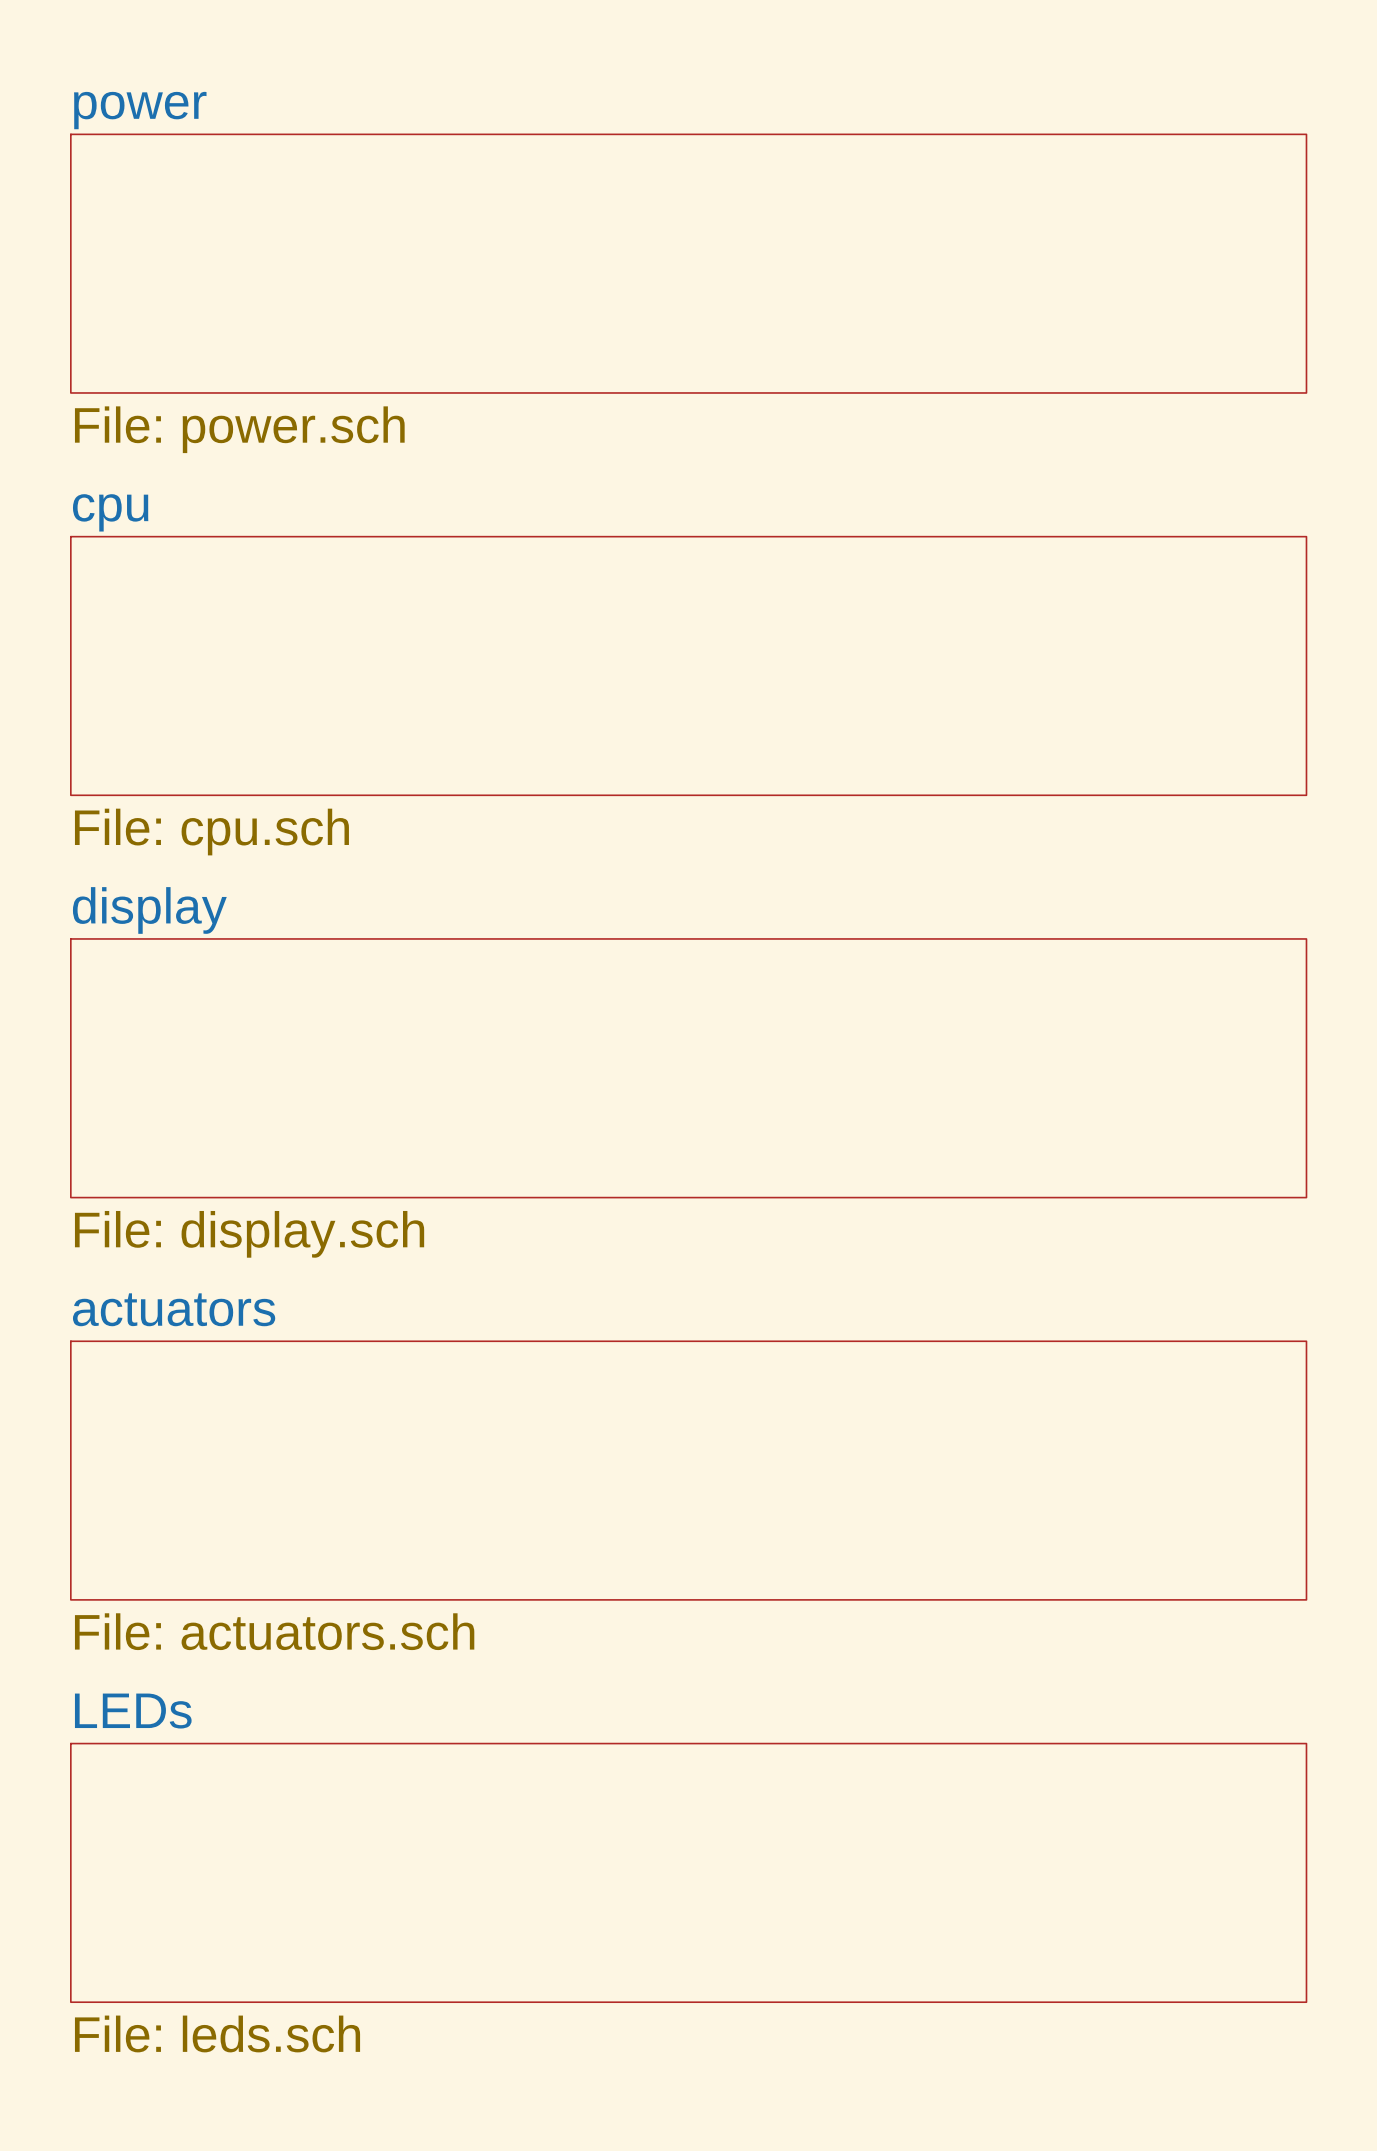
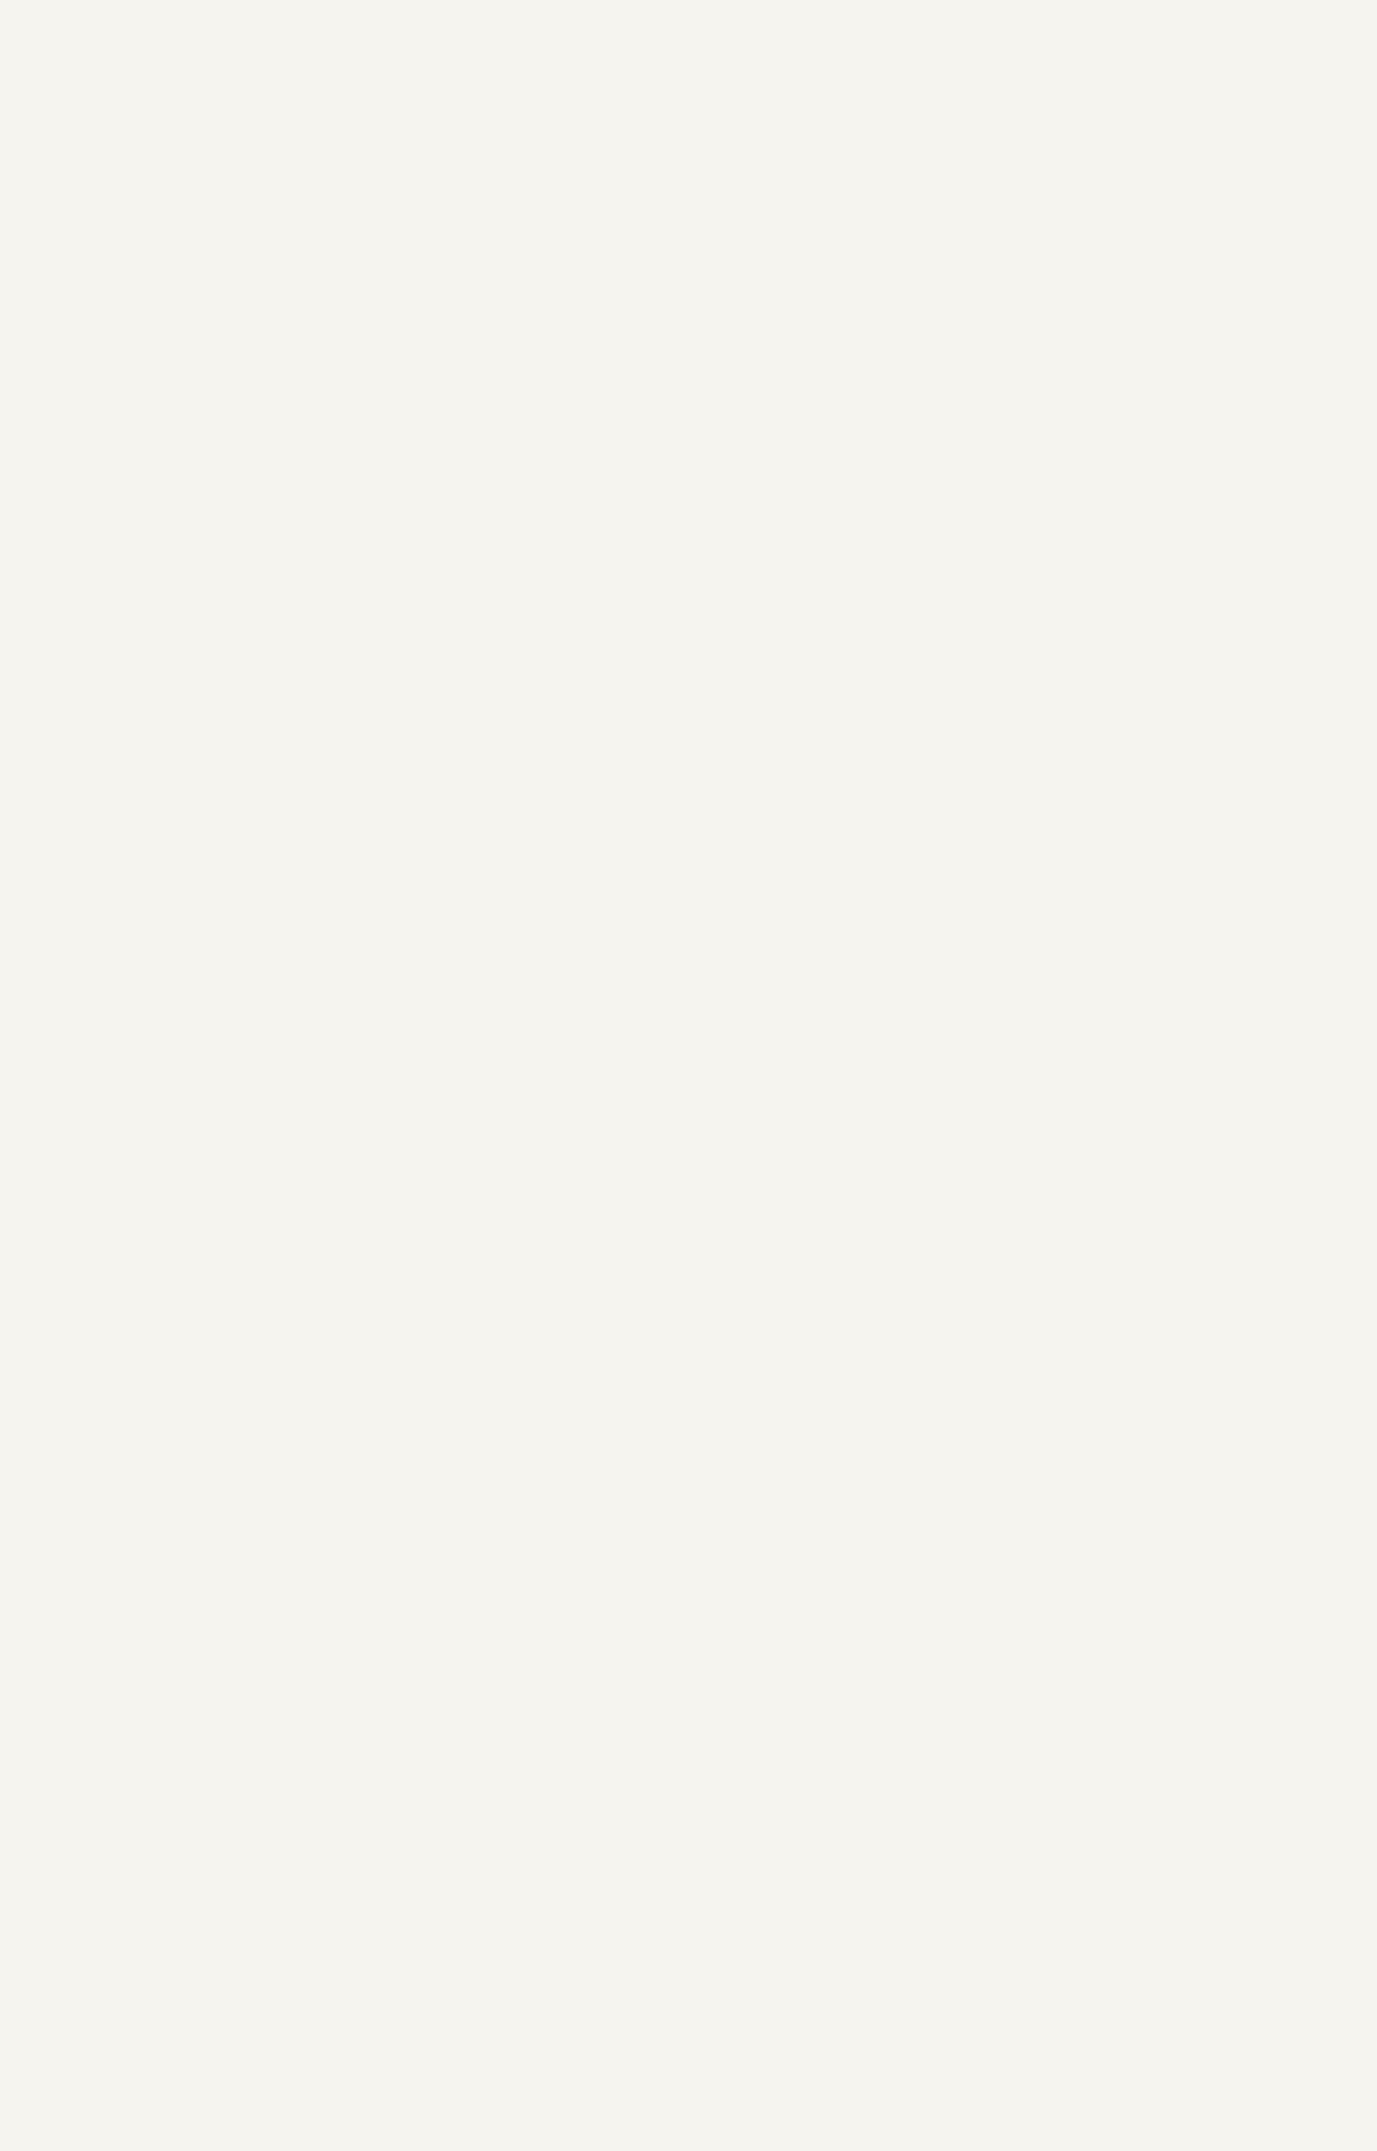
sheet power: File: power.sch (688, 263) -> none
sheet cpu: File: cpu.sch (688, 665) -> none
sheet display: File: display.sch (688, 1068) -> none
sheet actuators: File: actuators.sch (688, 1470) -> none
sheet LEDs: File: leds.sch (688, 1872) -> none

